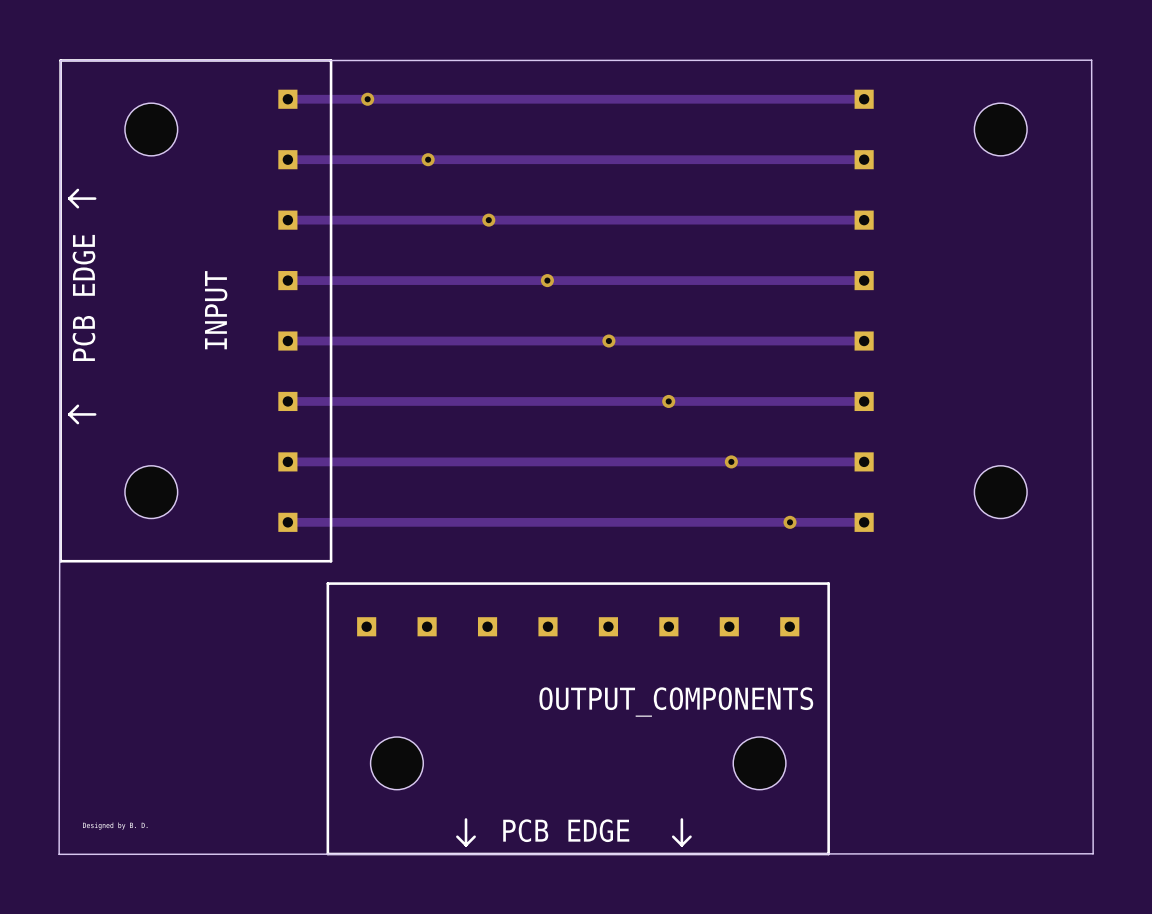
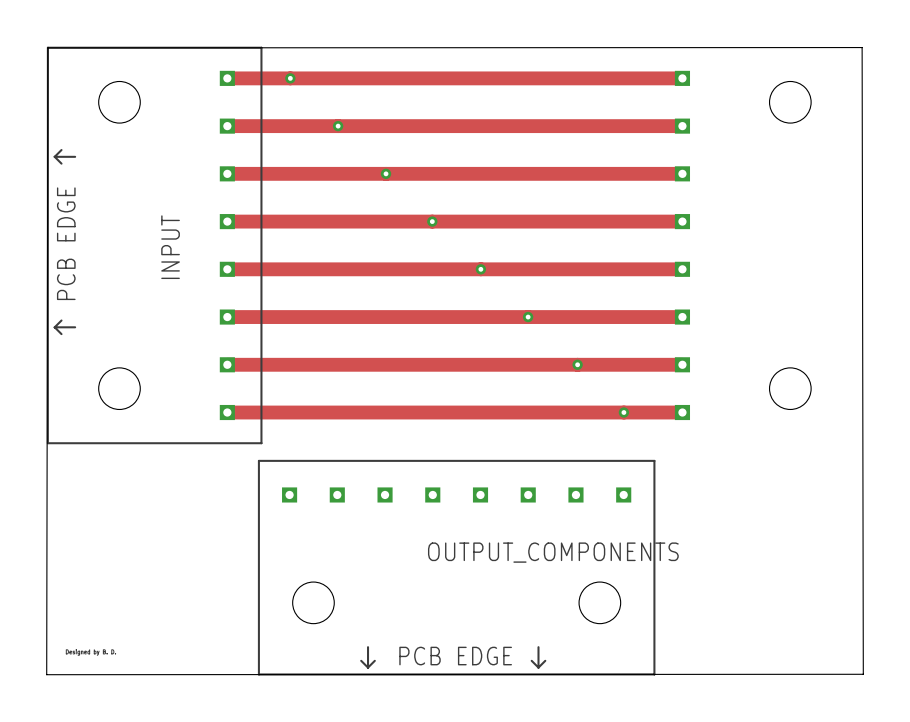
track width: thin (287, 99) (864, 99) -> thick (227, 78) (682, 78)
track width: thin (287, 159) (864, 159) -> thick (227, 126) (682, 126)
track width: thin (287, 220) (864, 220) -> thick (227, 173) (682, 173)
track width: thin (287, 280) (864, 280) -> thick (227, 221) (682, 221)
track width: thin (287, 341) (864, 341) -> thick (227, 269) (682, 269)
track width: thin (287, 401) (864, 401) -> thick (227, 317) (682, 317)
track width: thin (287, 461) (864, 461) -> thick (227, 364) (682, 364)
track width: thin (287, 522) (864, 522) -> thick (227, 412) (682, 412)

